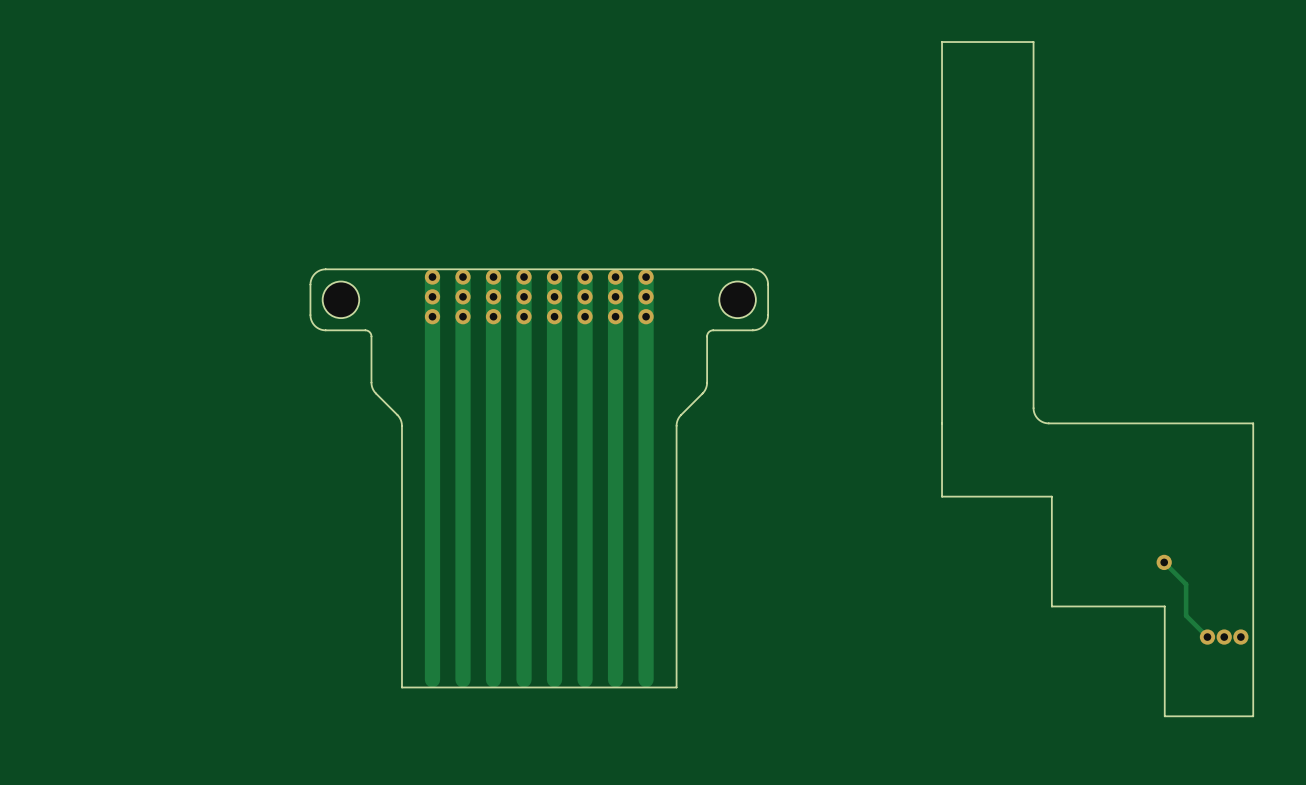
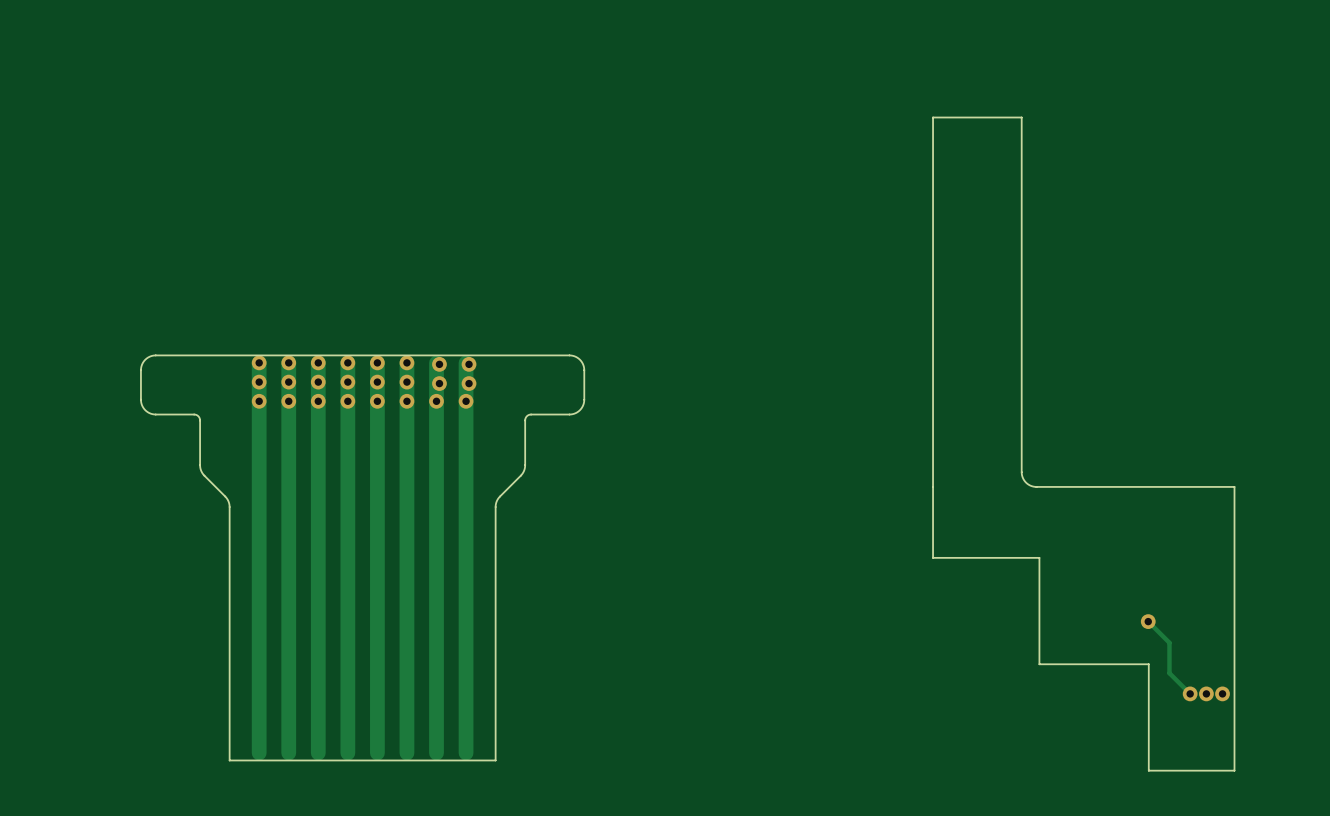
board edge: (752, 269) (325, 269) (319, 270) (313, 275) (310, 284) (310, 316) (312, 323) (317, 328) (323, 330) (365, 330) (369, 332) (371, 336) (372, 388) (401, 421) (401, 687) (676, 687) (676, 422) (680, 416) (706, 387) (707, 336) (708, 332) (713, 330) (756, 329) (762, 327) (766, 321) (767, 281) (762, 272) (752, 269) -> (569, 355) (155, 355) (144, 361) (140, 370) (141, 401) (143, 407) (154, 414) (194, 414) (198, 416) (200, 420) (201, 470) (229, 503) (229, 760) (495, 760) (495, 504) (498, 497) (524, 469) (525, 420) (526, 416) (531, 414) (572, 414) (582, 406) (583, 366) (578, 358) (569, 355)
track: (432, 277) (432, 679) -> (259, 362) (259, 753)
via: (432, 277) -> none
track: (463, 277) (463, 679) -> (288, 362) (288, 753)
via: (463, 277) -> none
track: (493, 277) (493, 679) -> (318, 362) (318, 753)
via: (493, 277) -> none
track: (524, 277) (524, 679) -> (347, 362) (347, 753)
via: (524, 277) -> none
track: (554, 277) (554, 679) -> (377, 362) (377, 753)
via: (554, 277) -> none
track: (585, 277) (585, 679) -> (406, 362) (406, 753)
via: (585, 277) -> none
track: (615, 277) (615, 679) -> (436, 362) (436, 753)
via: (615, 277) -> none
track: (646, 277) (646, 679) -> (466, 362) (466, 753)
via: (646, 277) -> none
via: none -> (259, 362)
via: none -> (288, 362)
via: none -> (318, 362)
via: none -> (347, 362)
via: none -> (377, 362)
via: none -> (406, 362)
via: (493, 296) -> none
via: (524, 296) -> none
via: (554, 296) -> none
via: (585, 296) -> none
via: (615, 296) -> none
via: (646, 296) -> none
part: (340, 299) -> none
part: (737, 299) -> none
via: none -> (259, 382)
via: none -> (288, 382)
via: none -> (318, 382)
via: none -> (347, 382)
via: none -> (377, 382)
via: none -> (406, 382)
via: (493, 316) -> none
via: (524, 316) -> none
via: (554, 316) -> none
via: (585, 316) -> none
via: (615, 316) -> none
via: (646, 316) -> none
via: none -> (259, 401)
via: none -> (288, 401)
via: none -> (318, 401)
via: none -> (347, 401)
via: none -> (377, 401)
via: none -> (406, 401)
via: none -> (436, 401)
via: none -> (466, 401)

